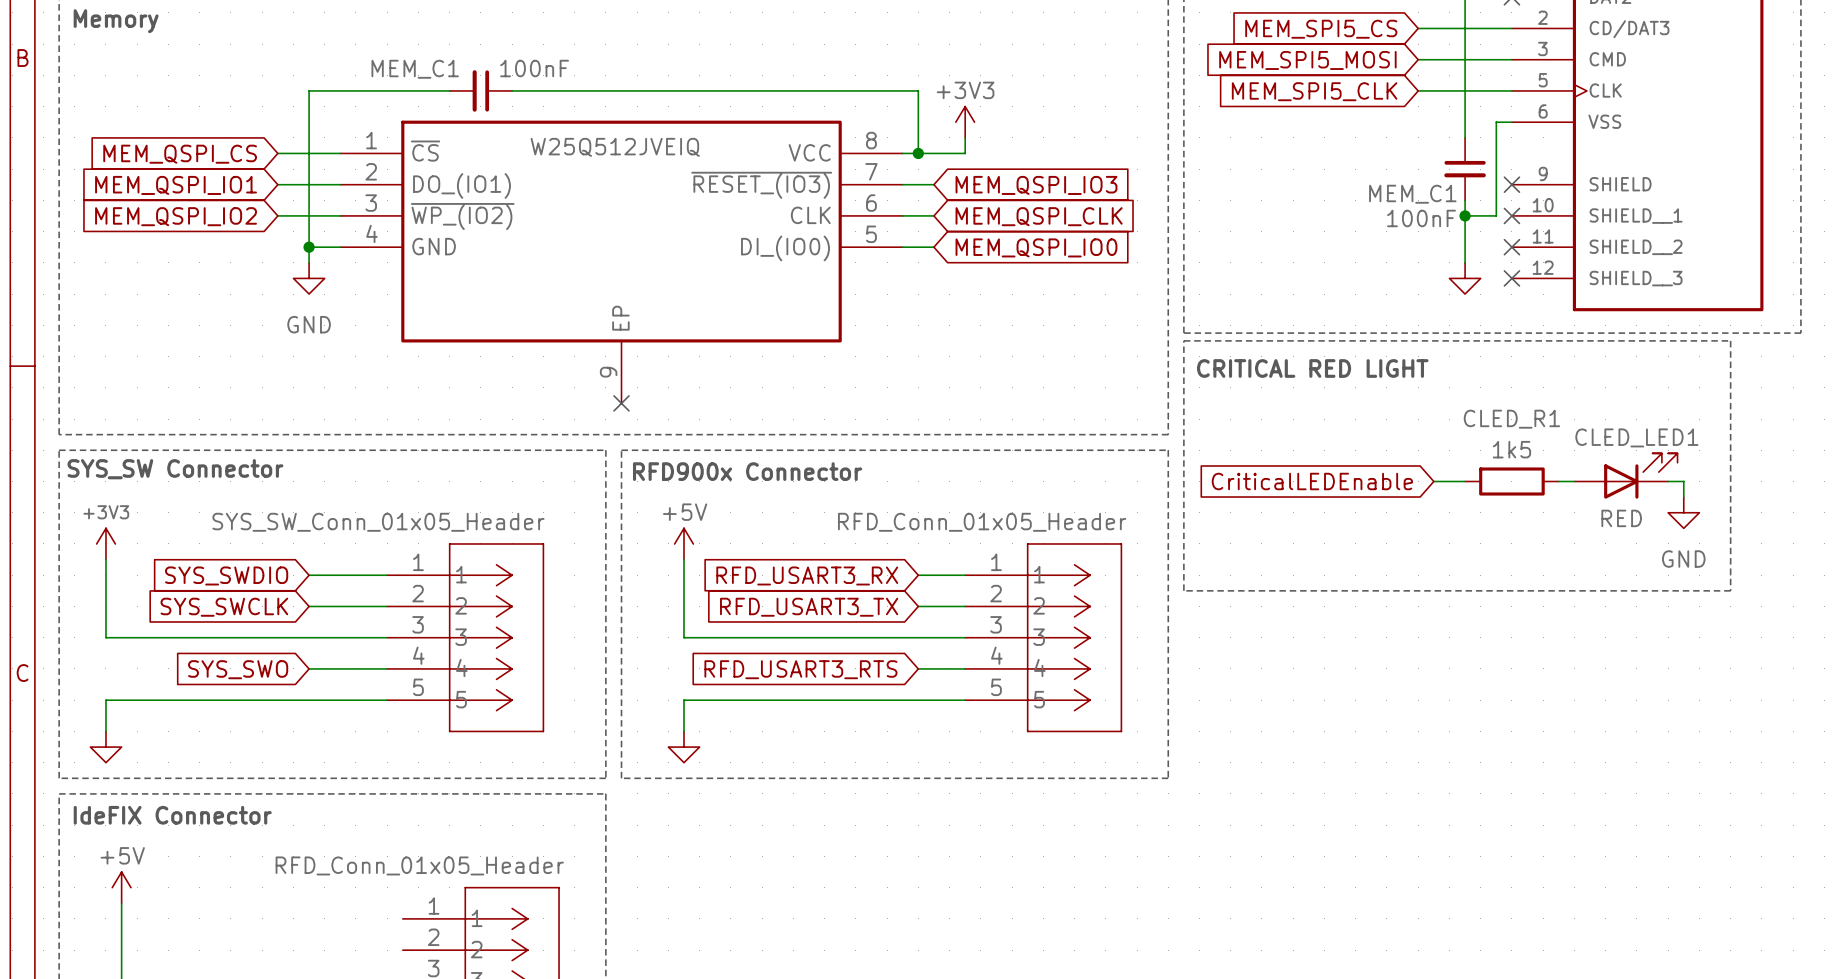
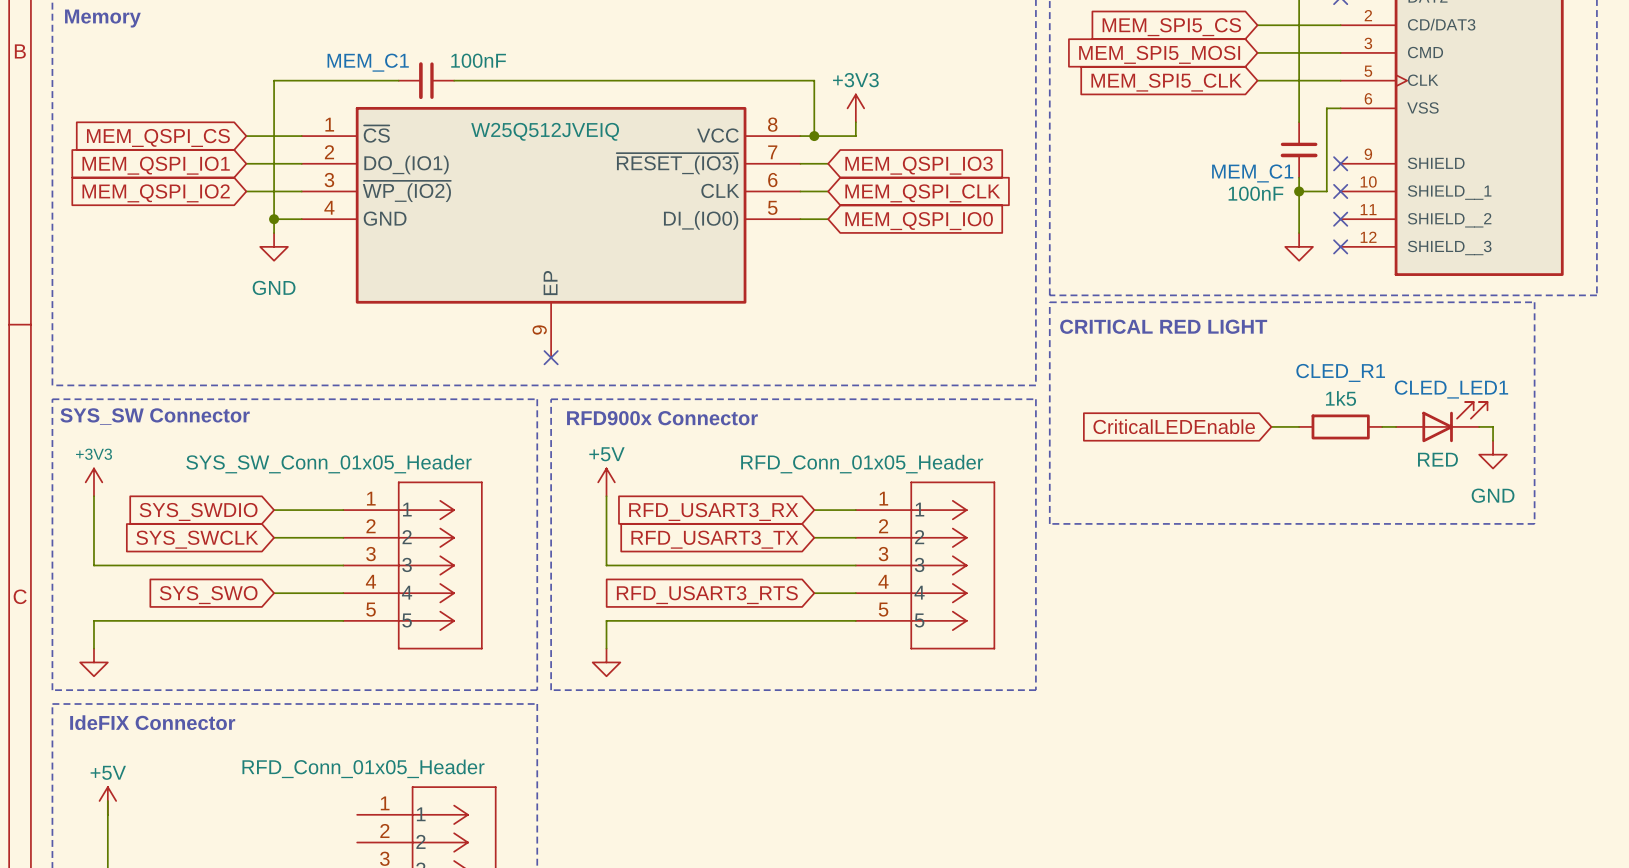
power symbol position: +5V (121, 887) -> +5V (107, 800)

